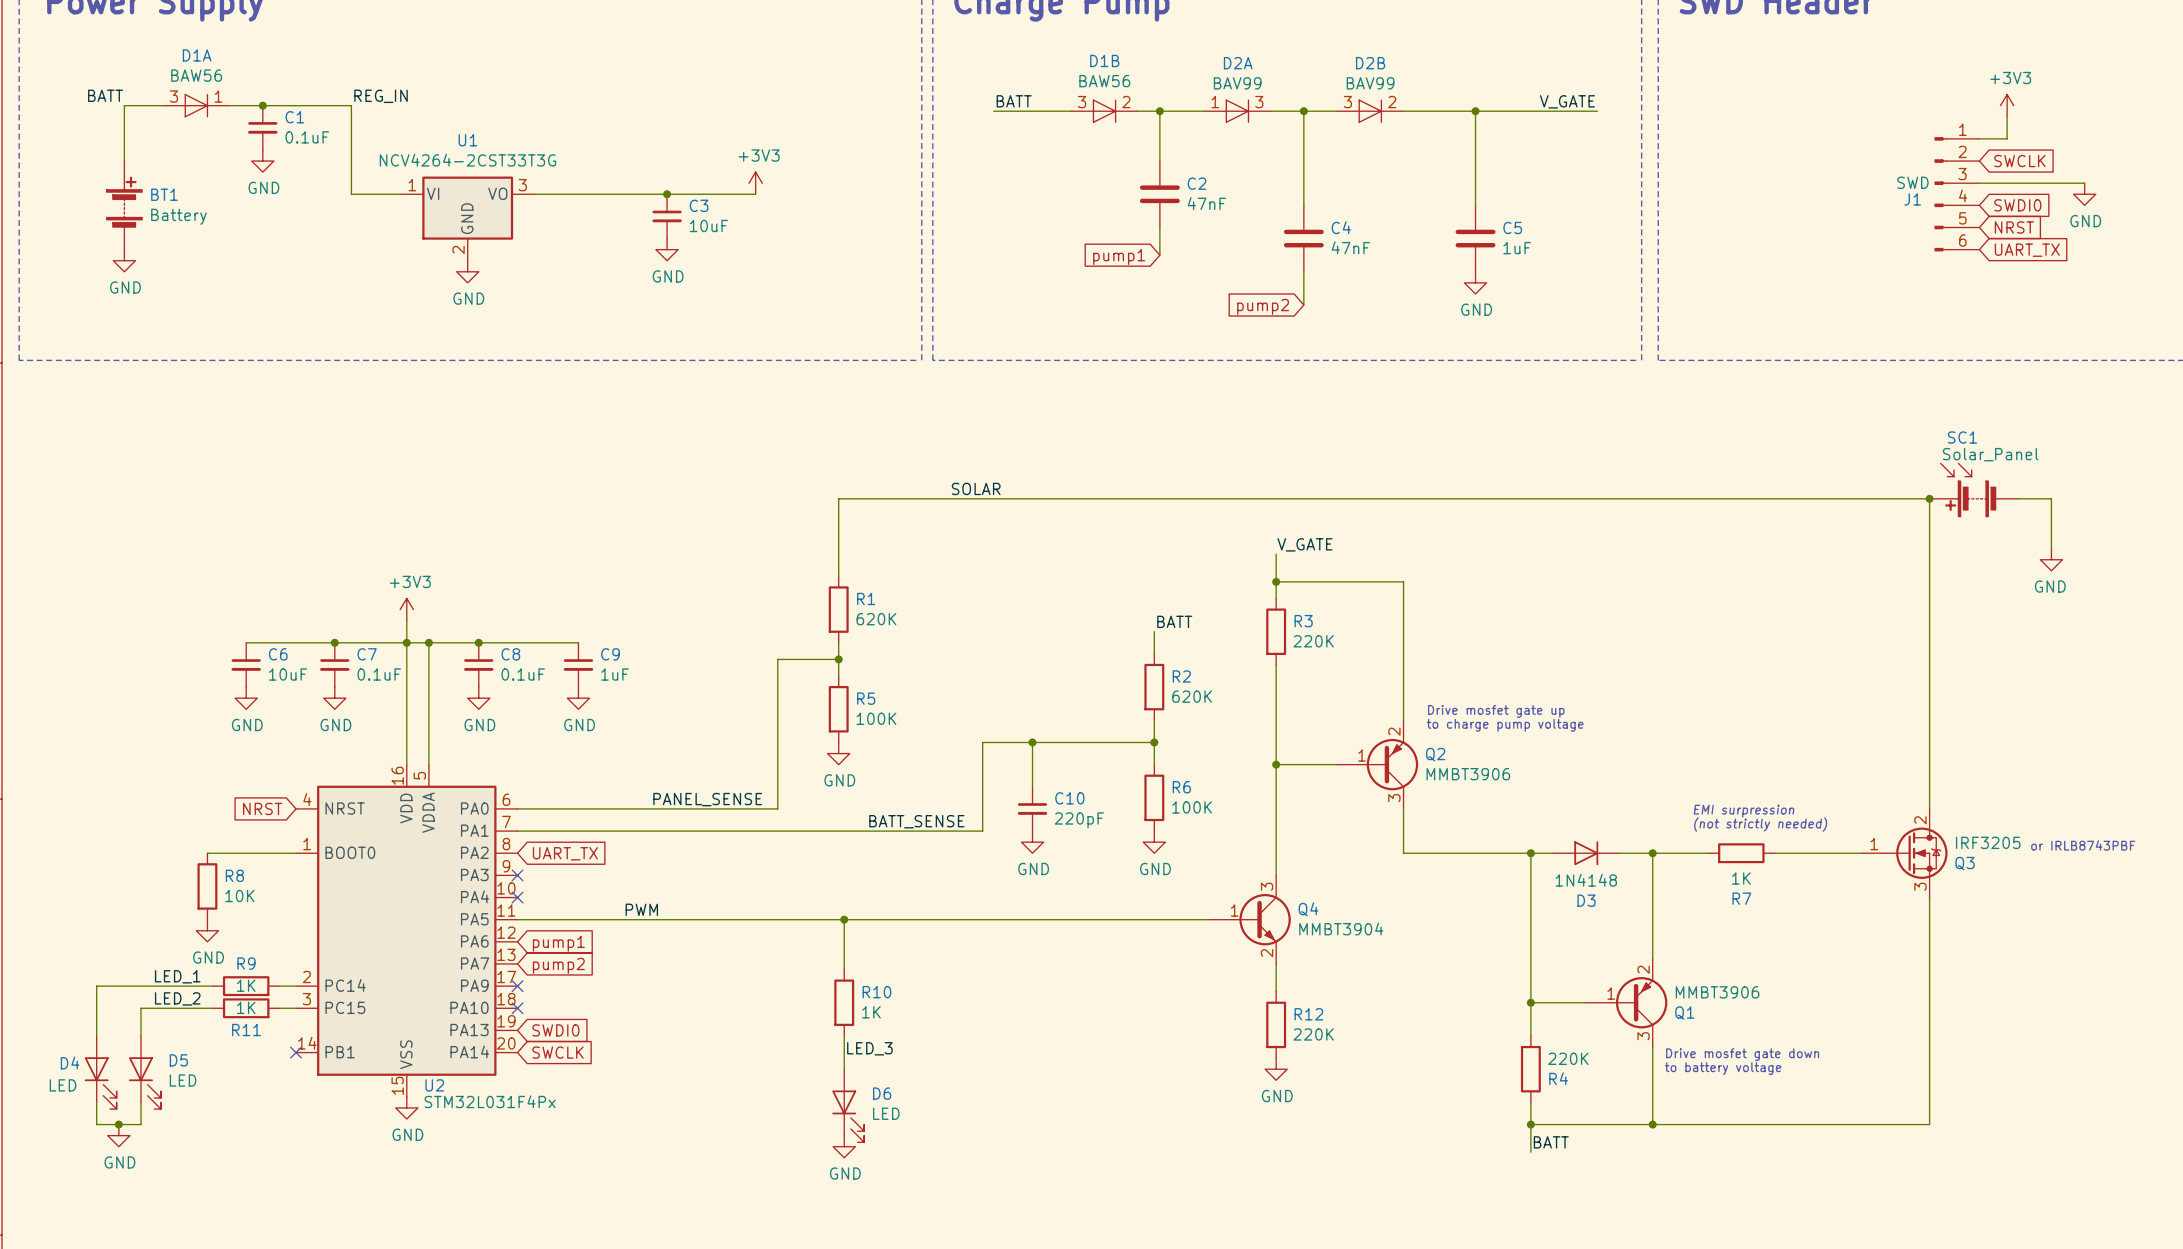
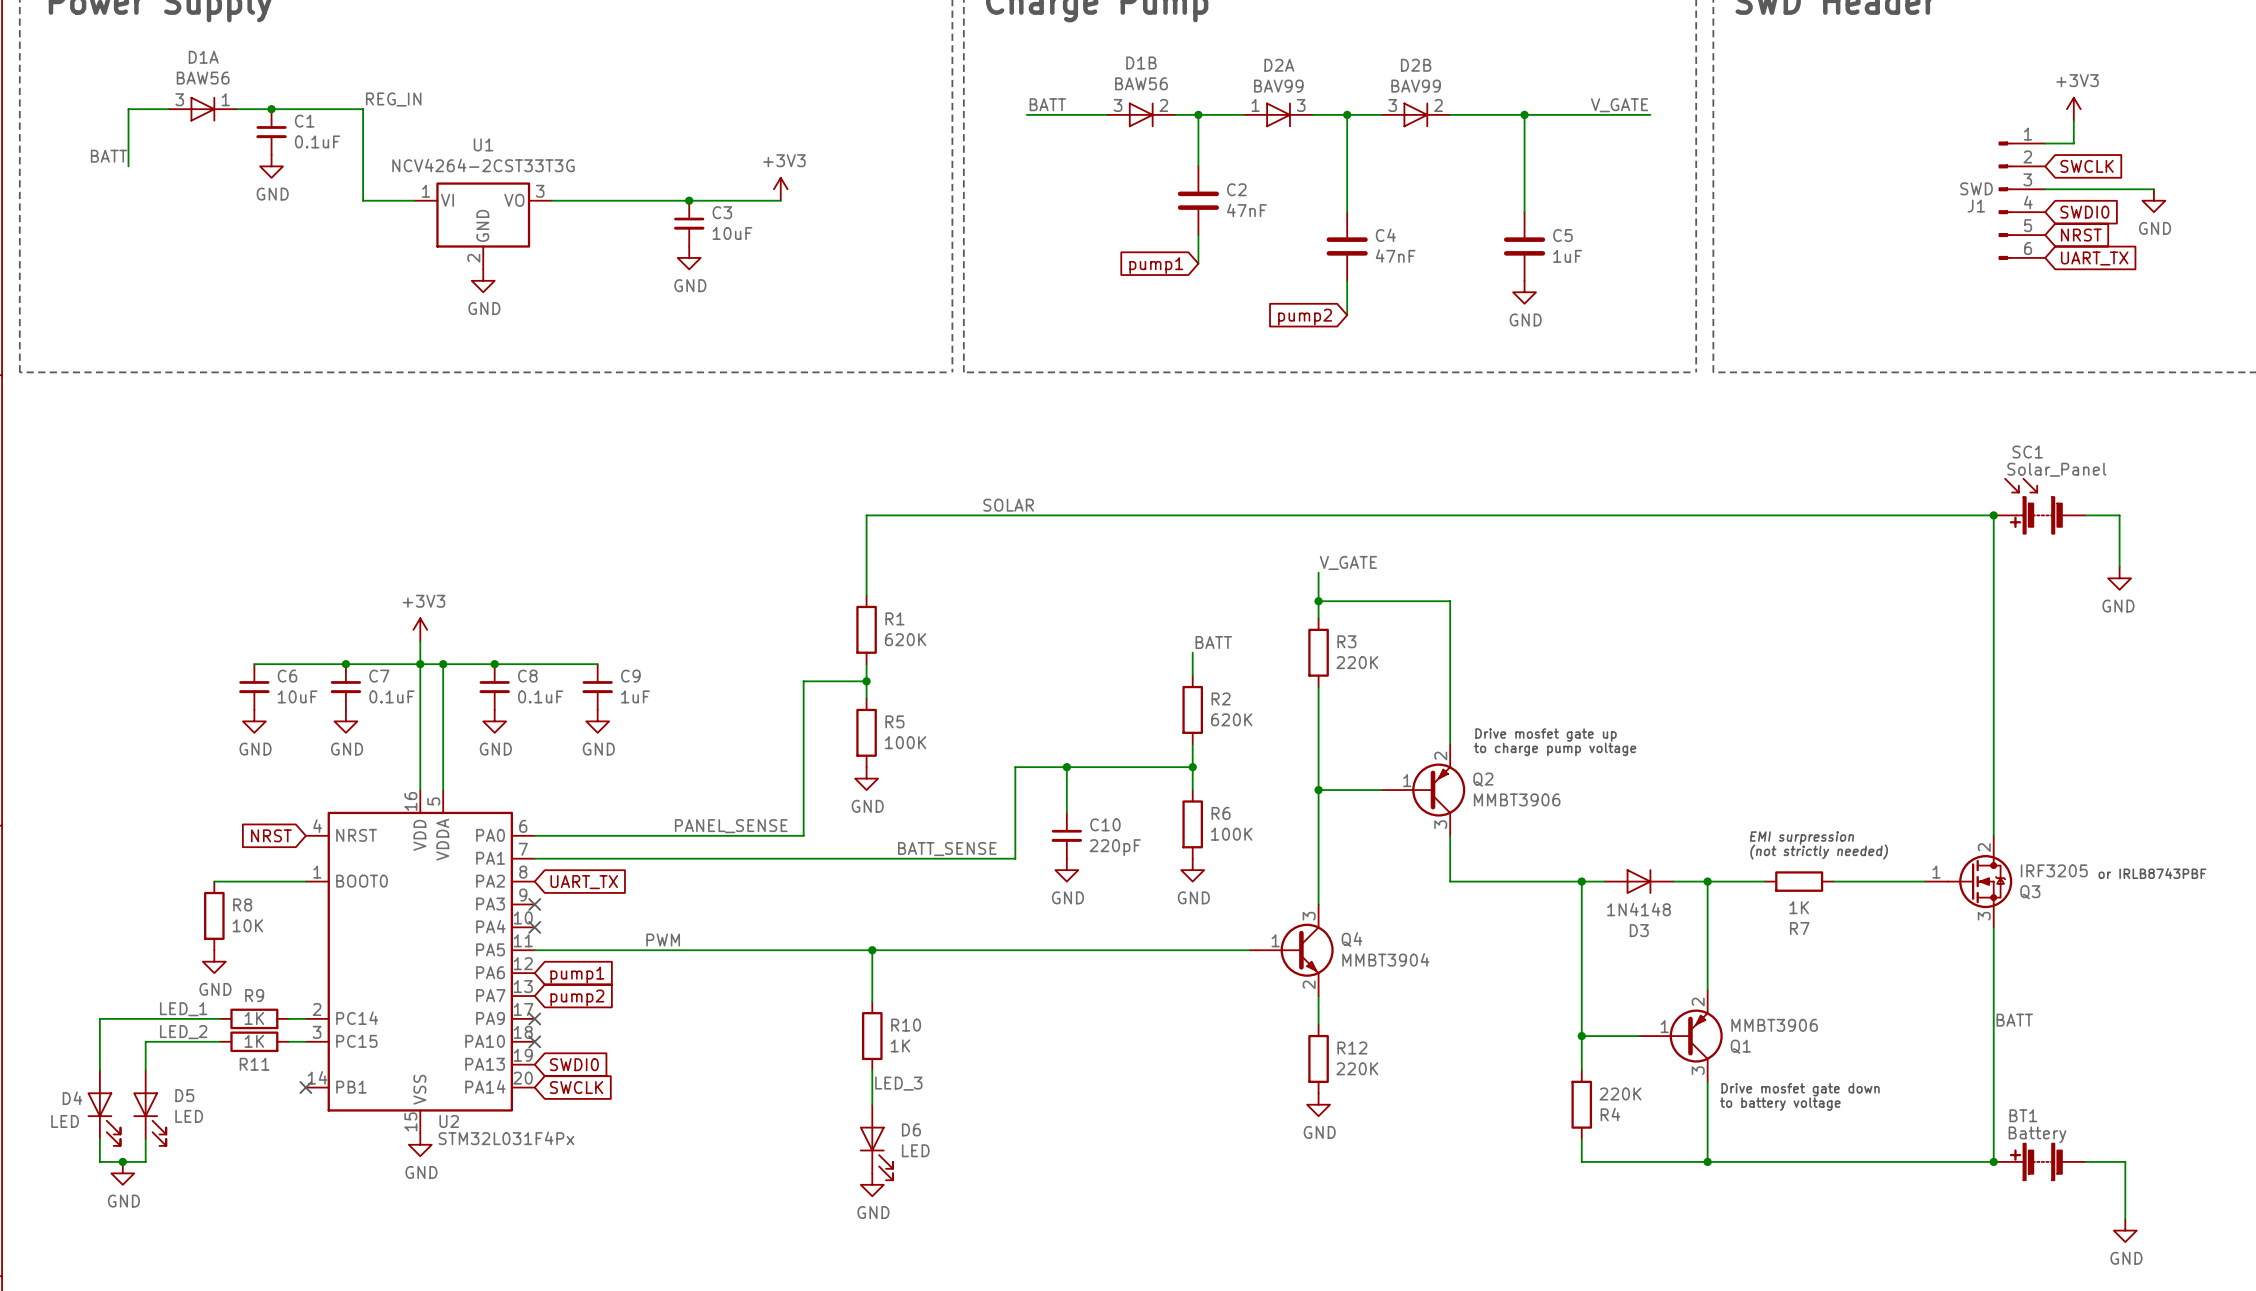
label position: BATT (105, 95) -> BATT (109, 156)
BT1 rotation: 0° (124, 201) -> 90° counterclockwise (2035, 1161)
BT1 position: (124, 205) -> (2039, 1161)
BT1 value position: Battery (178, 216) -> Battery (2037, 1134)
power symbol: GND (124, 260) -> none
label: none -> BATT (2014, 1020)
wire: (1530, 1124) (1530, 1152) -> none
junction: (1530, 1124) -> none
junction: none -> (1993, 1161)
wire: none -> (2085, 1161) (2125, 1161) (2125, 1219)
label: BATT (1551, 1142) -> none
power symbol: none -> GND (2125, 1230)

